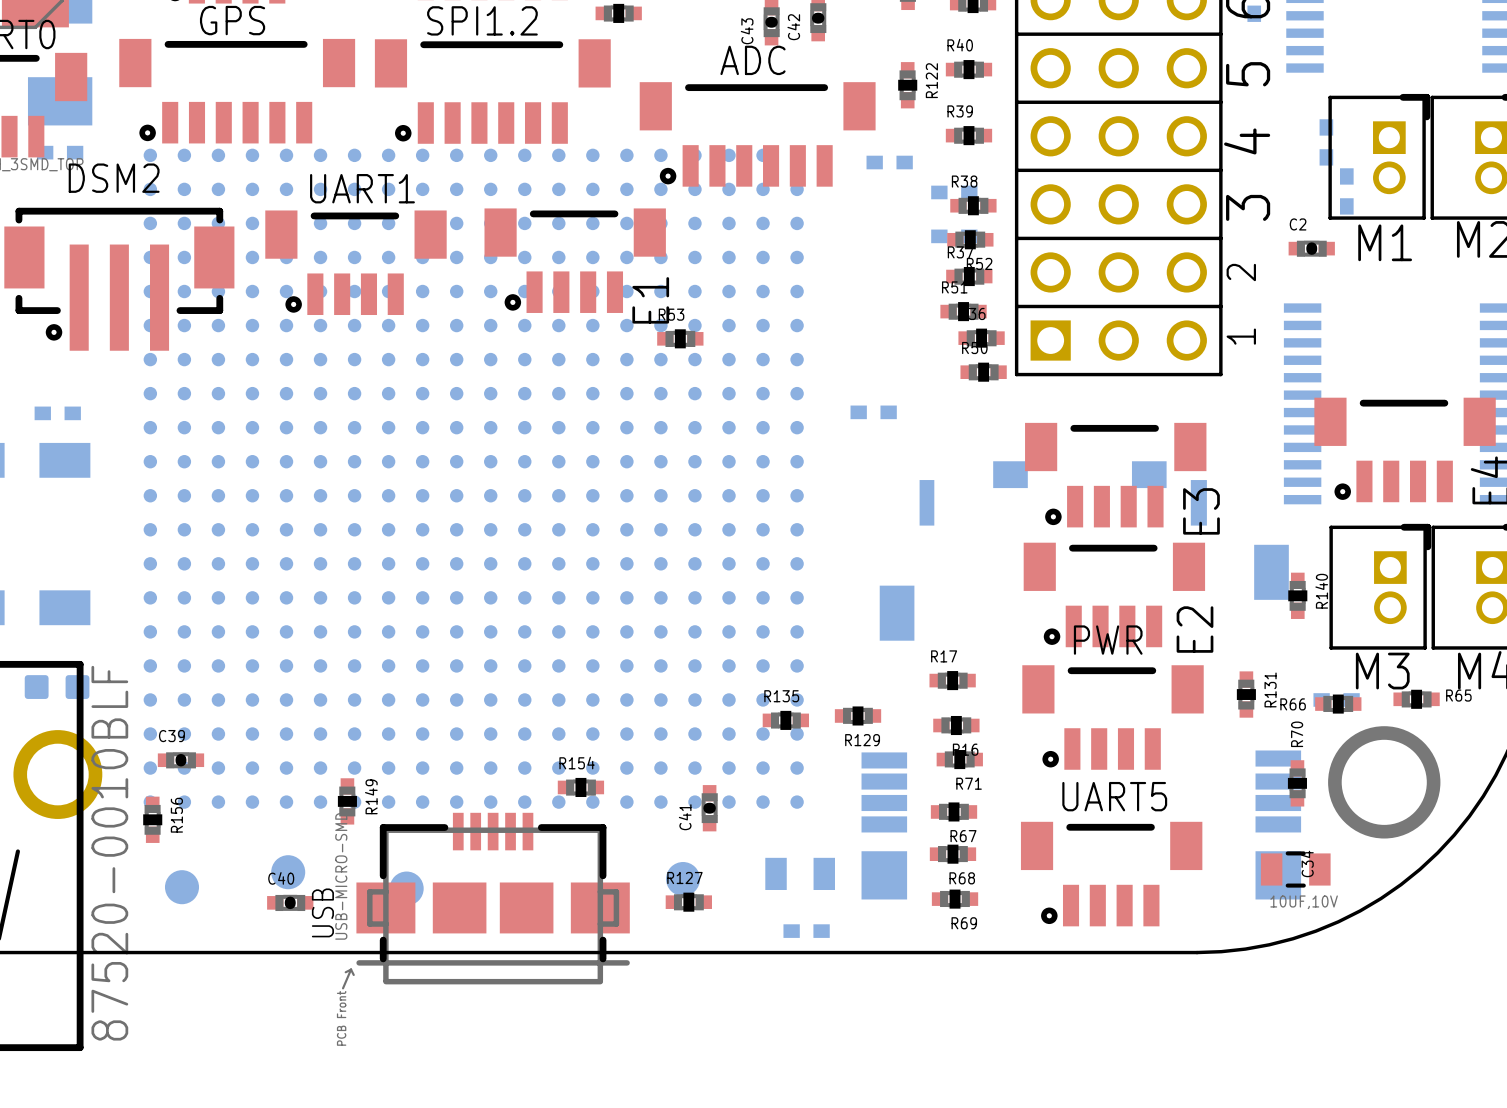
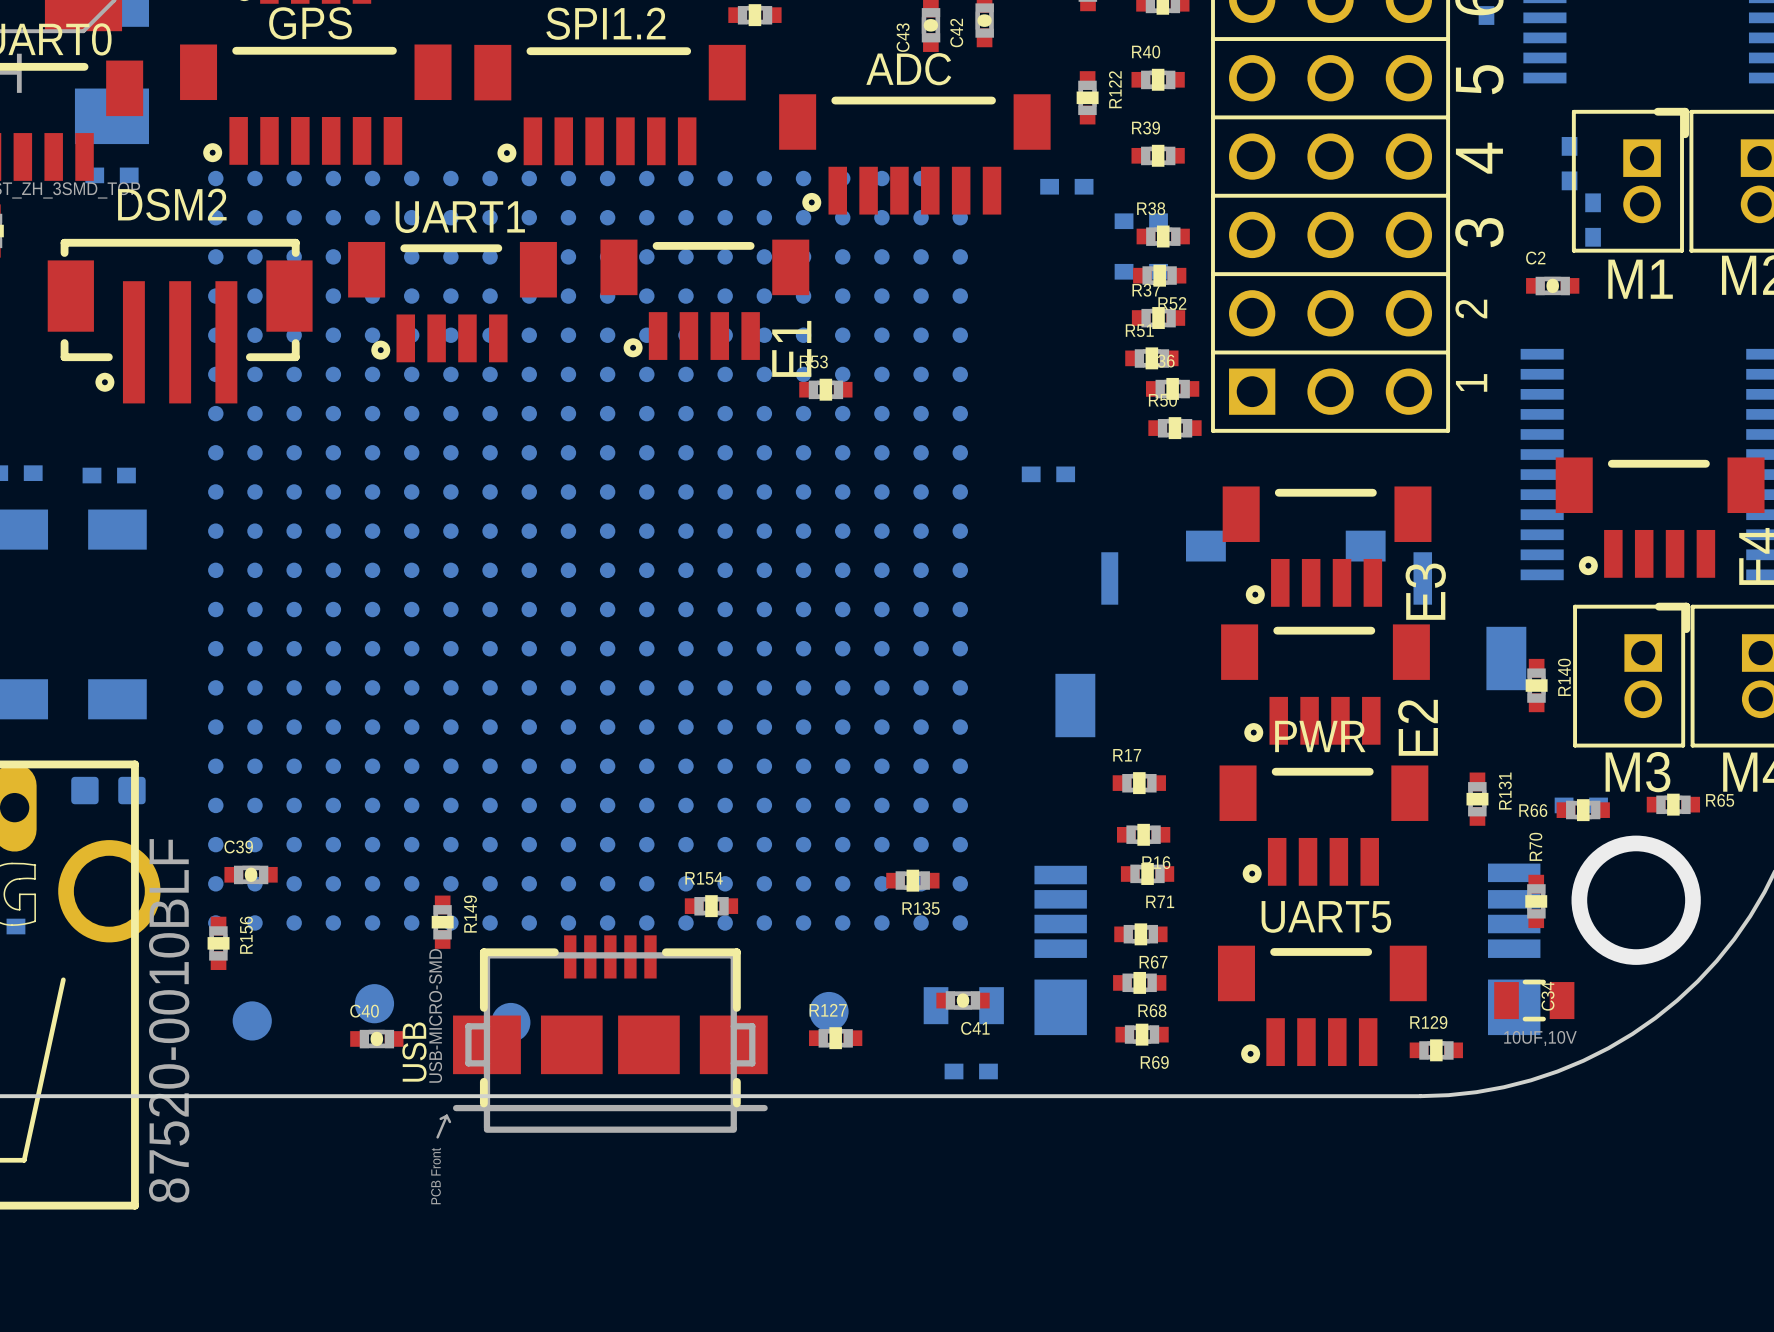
R135 name position: R135 (781, 696) -> R135 (921, 908)
R129 position: (858, 715) -> (1436, 1050)
R135 position: (785, 720) -> (912, 880)
R129 name position: R129 (862, 740) -> R129 (1428, 1022)
C41 rotation: 0° (709, 808) -> 90° clockwise (963, 1000)
C41 position: (709, 808) -> (963, 1000)

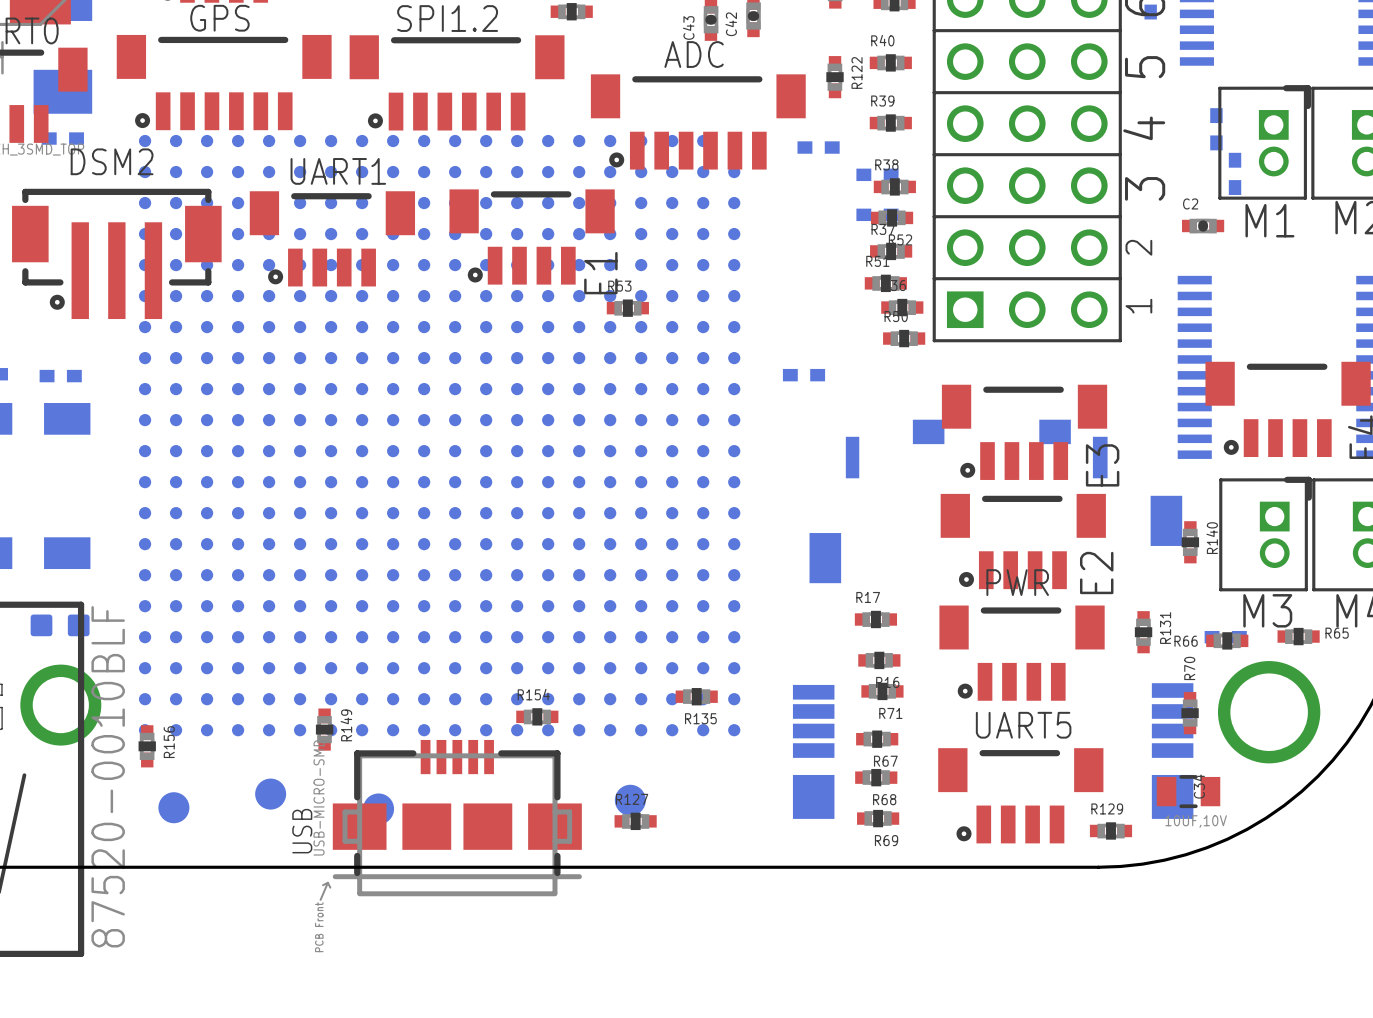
C39: (251, 874) -> none
C41: (963, 1000) -> none
part: (963, 1005) -> none
C40: (376, 1039) -> none
part: (971, 1071) -> none

